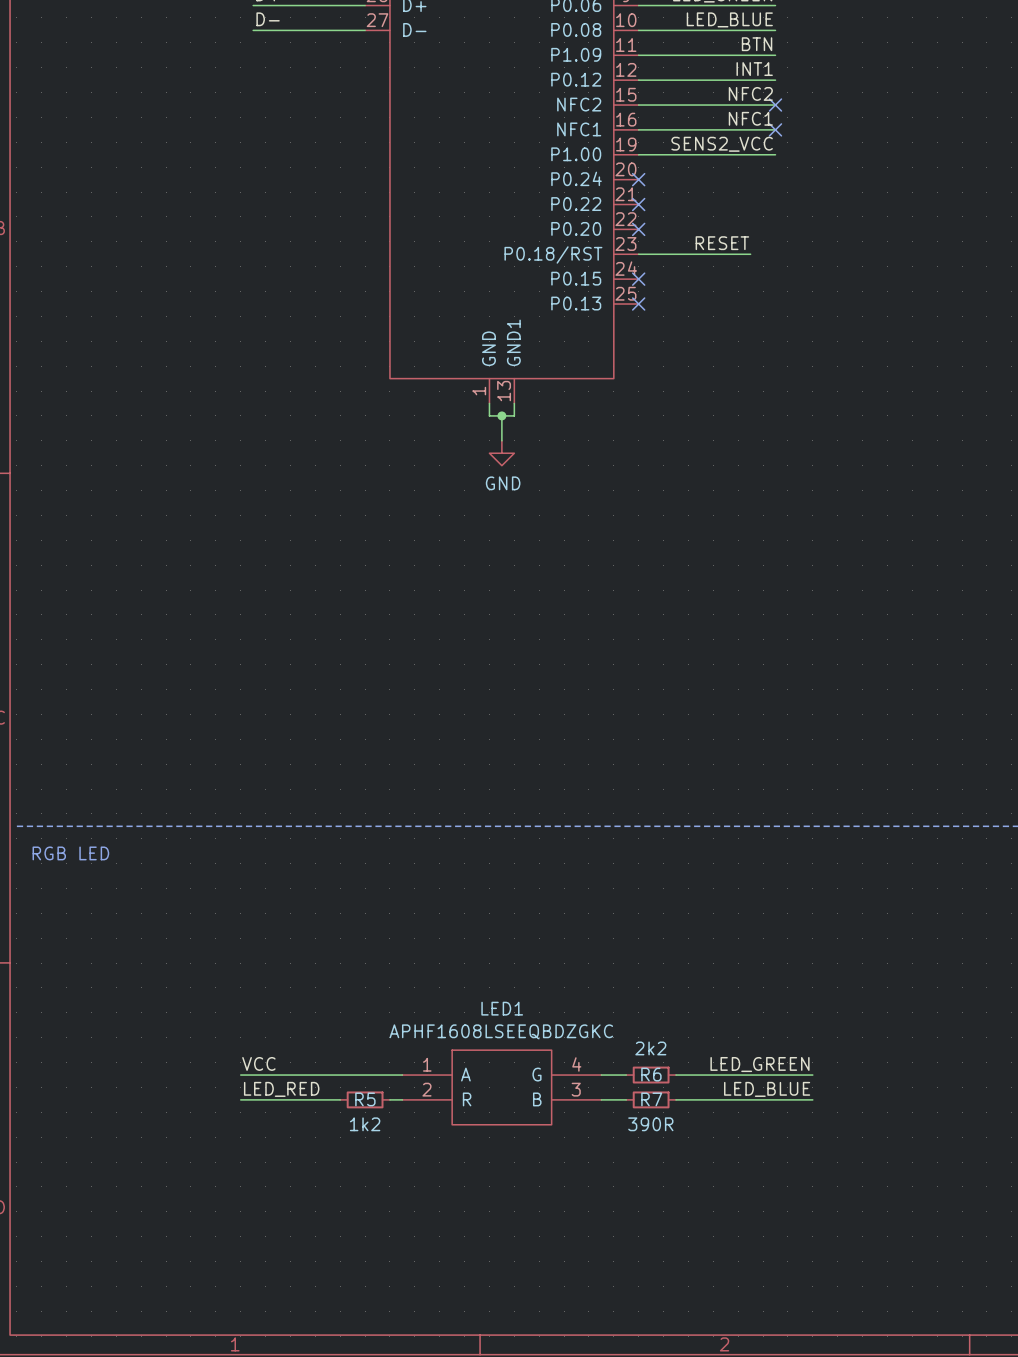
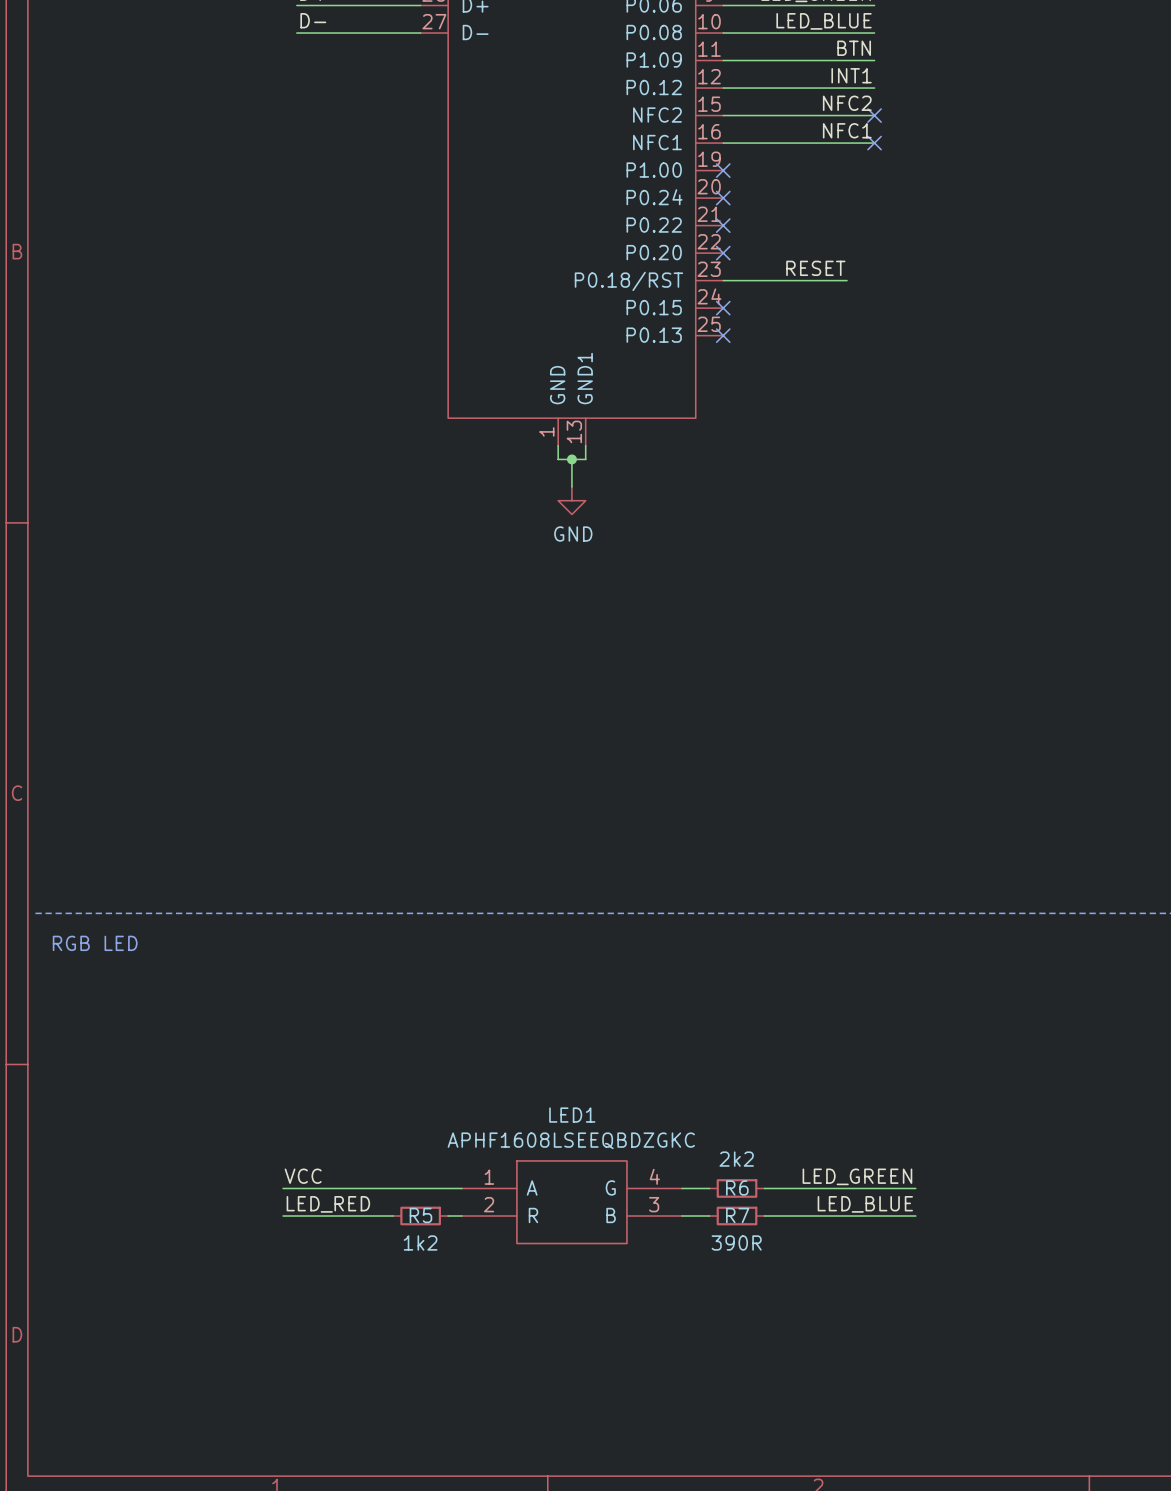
label: SENS2_VCC (722, 144) -> none
wire: (638, 154) (775, 154) -> none
no-connect mark: none -> (723, 170)

